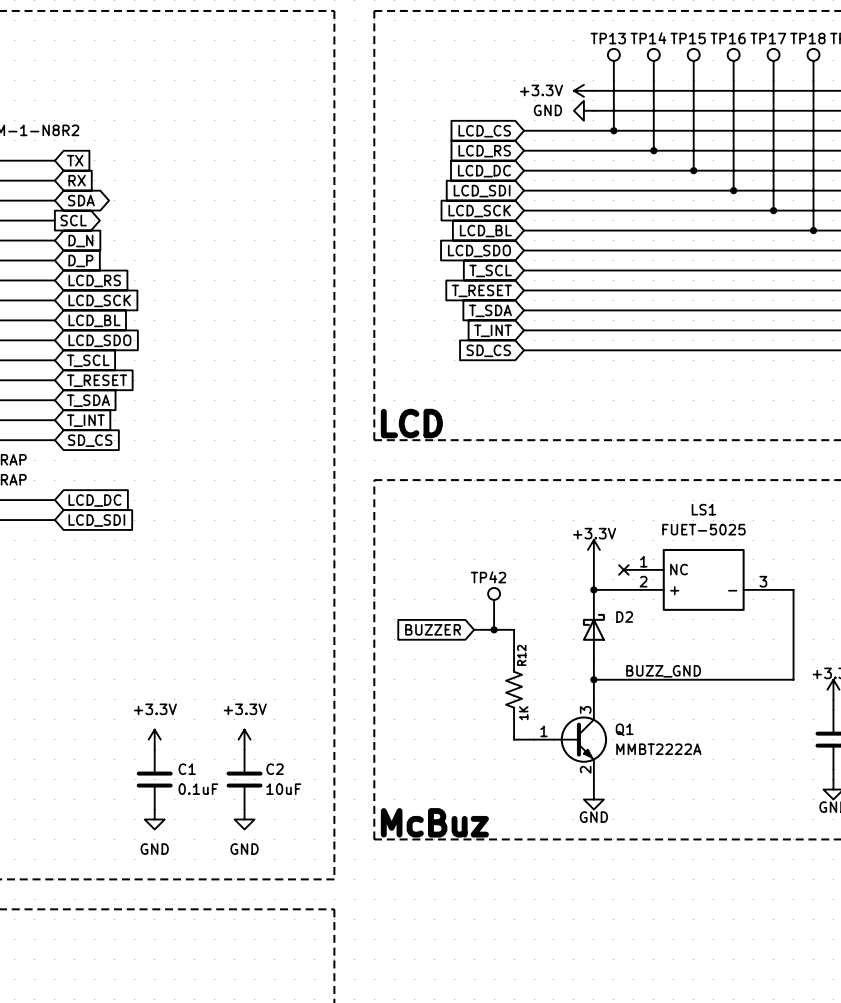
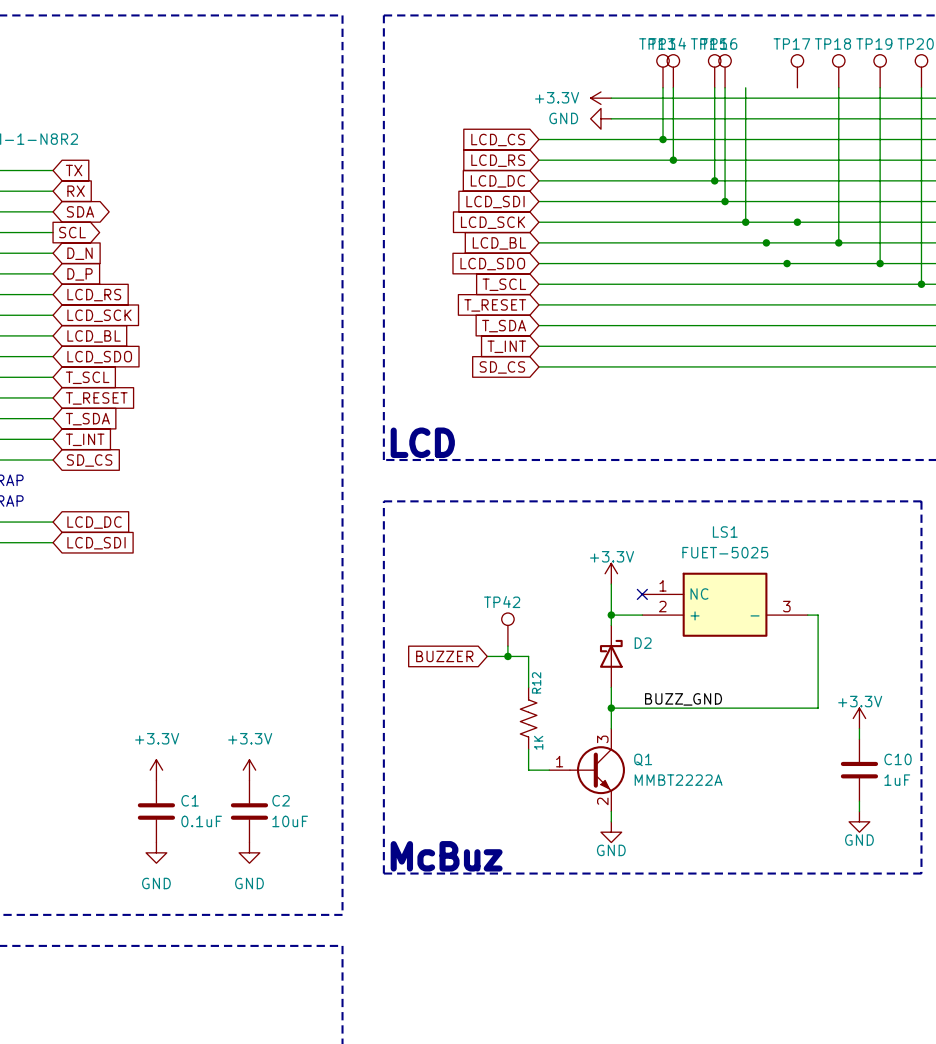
TP13 position: (613, 64) -> (663, 71)
TP16 position: (733, 64) -> (725, 71)
wire: (613, 80) (613, 130) -> (663, 87) (663, 139)
wire: (733, 80) (733, 190) -> (725, 87) (725, 201)
wire: (773, 80) (773, 210) -> (745, 87) (745, 222)
junction position: (613, 130) -> (663, 139)
junction: none -> (725, 201)
junction: (733, 190) -> none
junction: none -> (745, 222)
junction: none -> (766, 242)
junction: none -> (787, 263)

